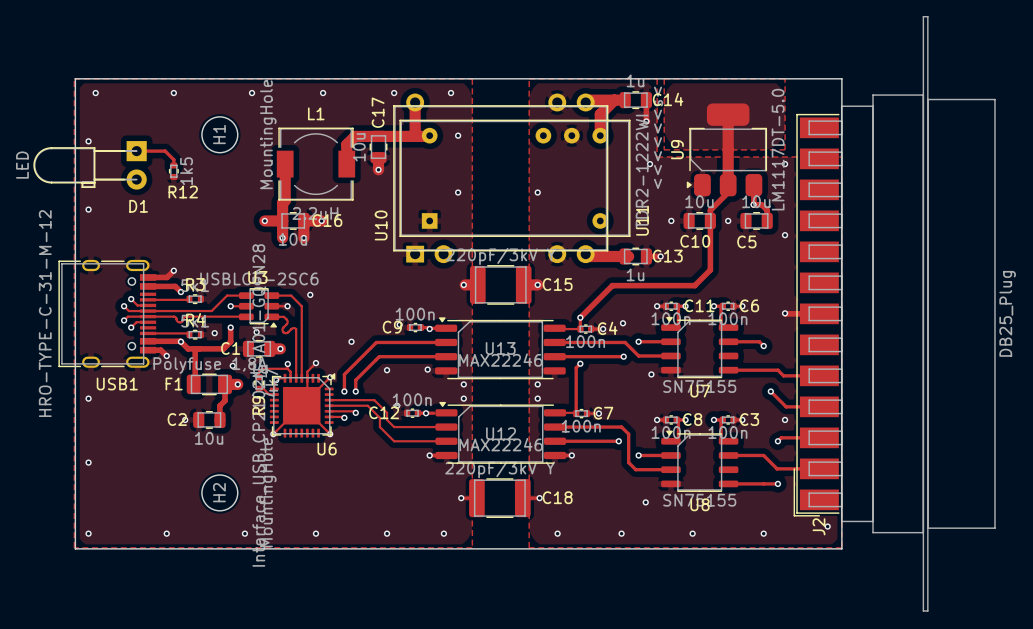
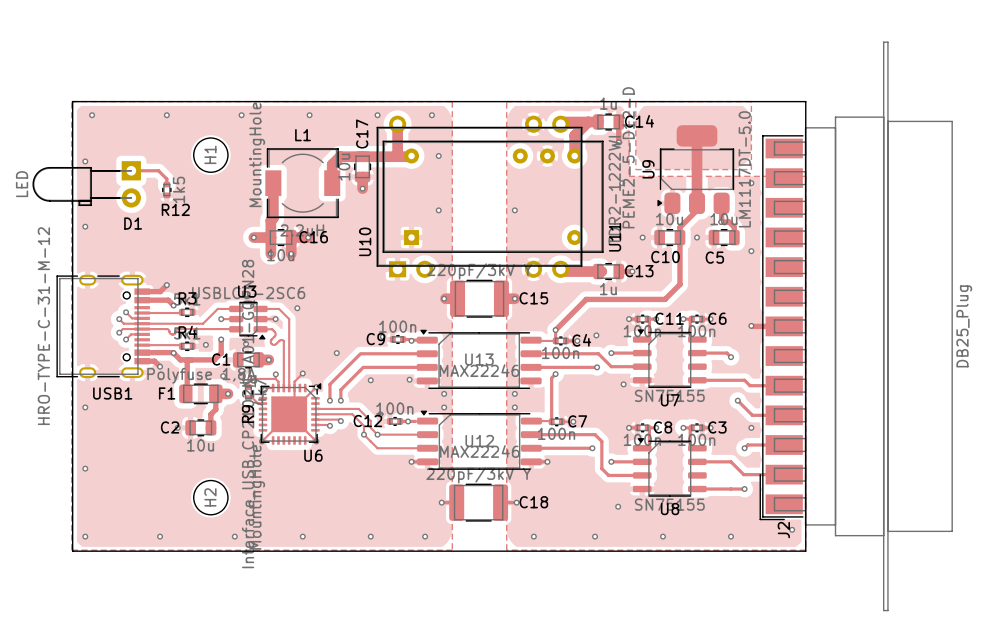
U11 value: <<<<<<s< (658, 137) -> PEME2-5-D12-D (628, 157)
via: none -> (363, 434)
via: none -> (377, 434)

